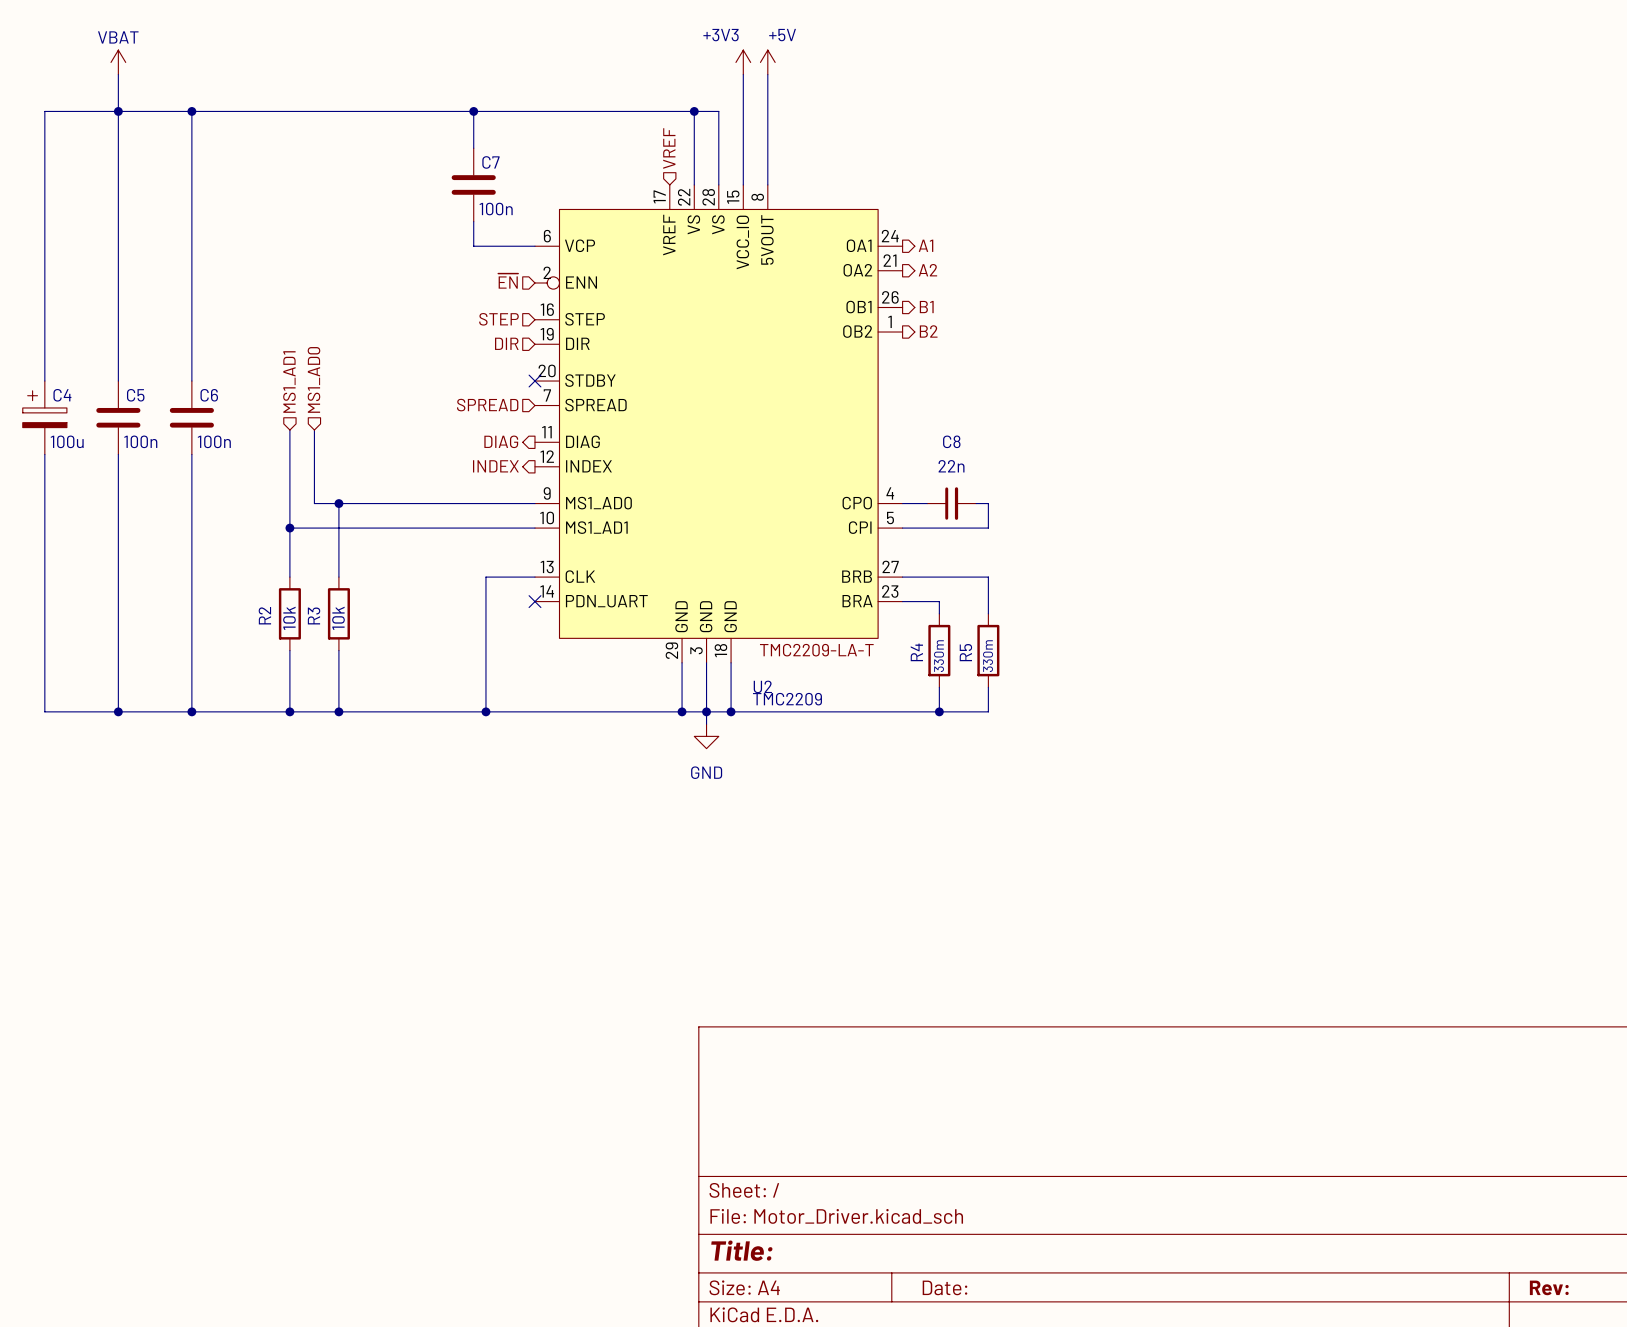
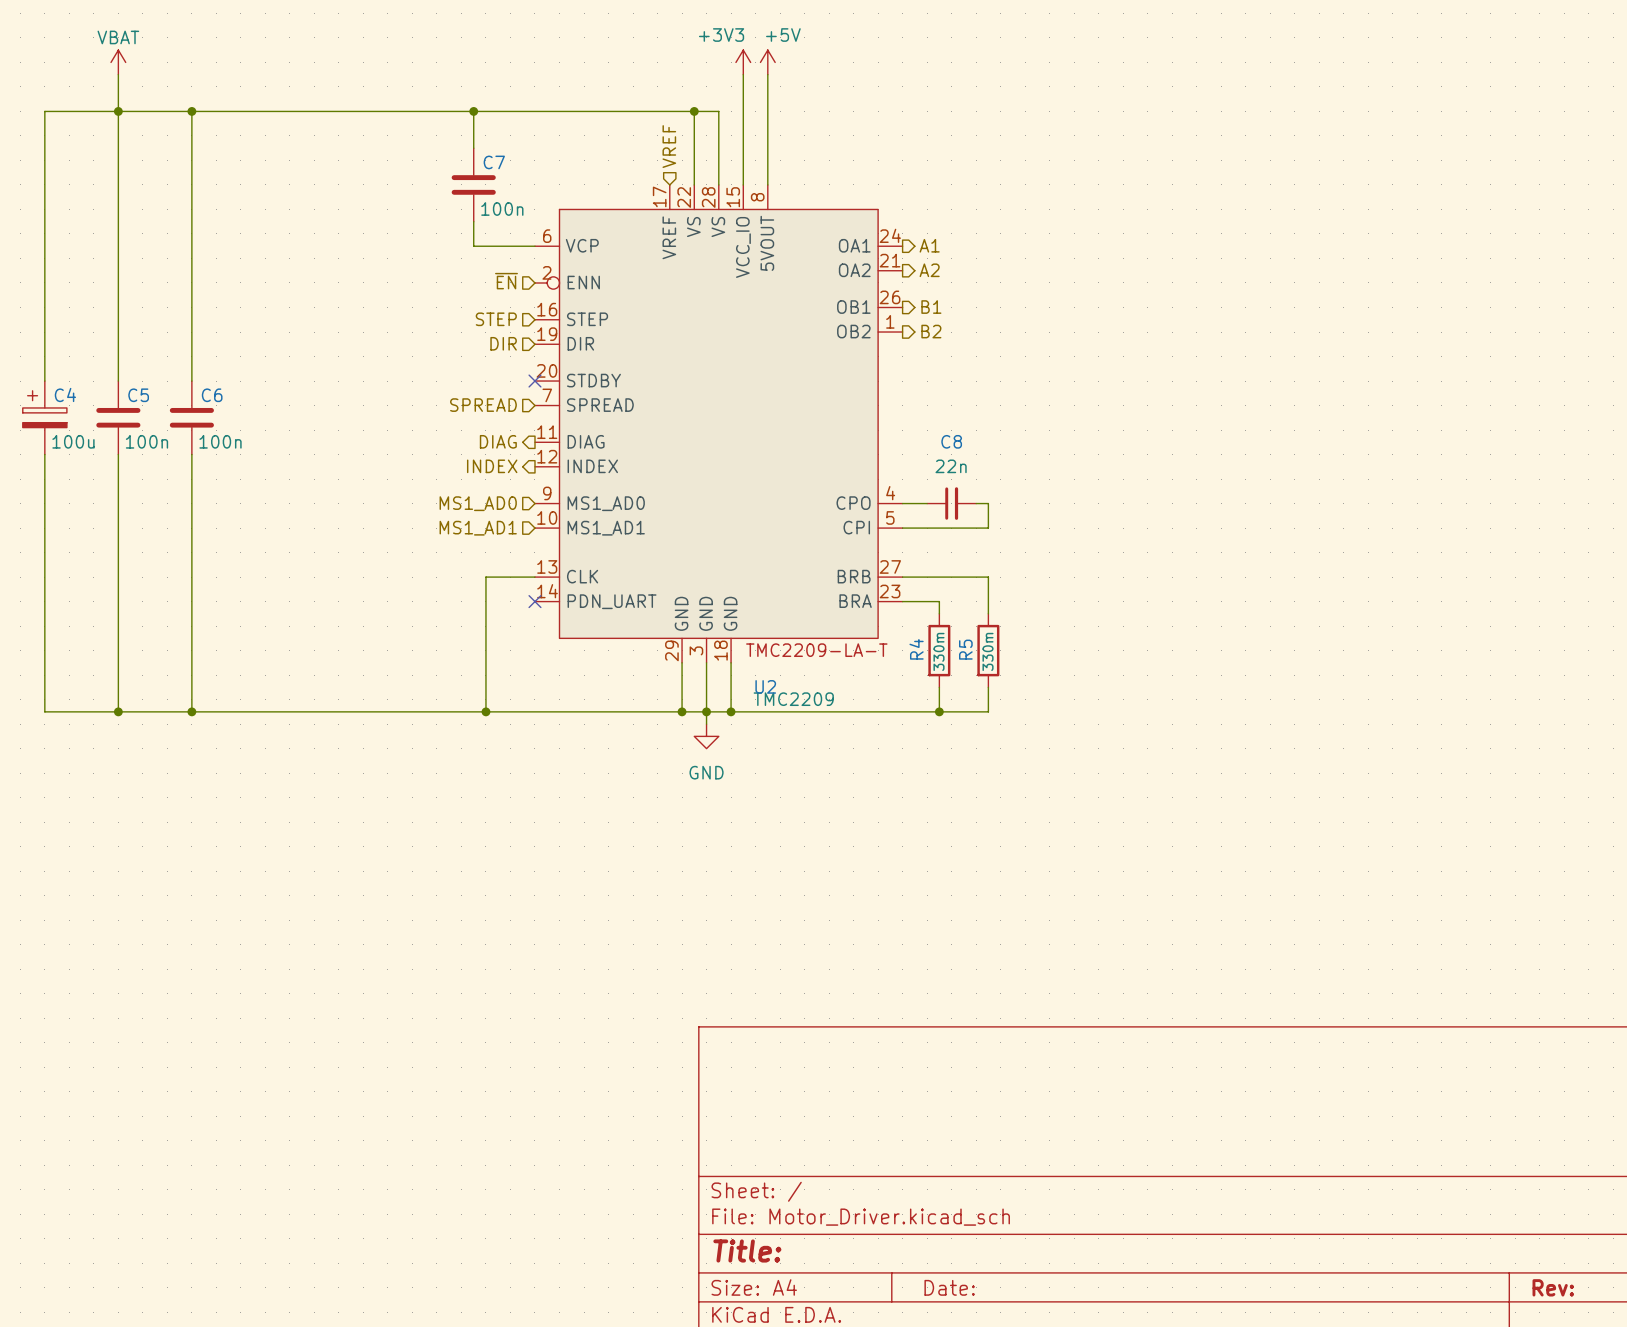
hierarchical label rotation: 0° (313, 379) -> 90° counterclockwise (478, 503)
hierarchical label position: MS1_AD0 (313, 379) -> MS1_AD0 (478, 503)
hierarchical label: MS1_AD1 (289, 382) -> none
wire: (289, 430) (289, 577) -> none
wire: (314, 430) (314, 503) (534, 503) -> none
wire: (338, 503) (338, 577) -> none
junction: (338, 503) -> none
hierarchical label: none -> MS1_AD1 (478, 528)
wire: (289, 528) (534, 528) -> none
junction: (289, 528) -> none
R2: 10k (289, 613) -> none
R3: 10k (338, 613) -> none
wire: (289, 650) (289, 711) -> none
wire: (338, 650) (338, 711) -> none
junction: (289, 711) -> none
junction: (338, 711) -> none

